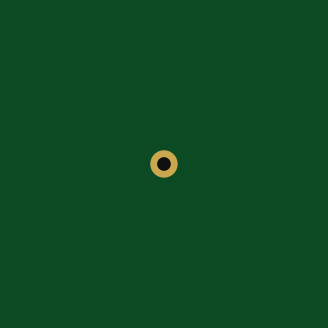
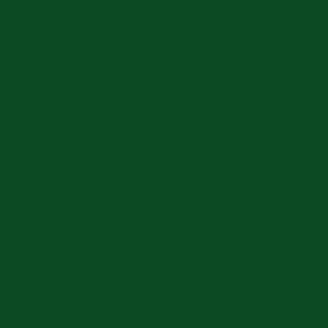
via: (163, 163) -> none

